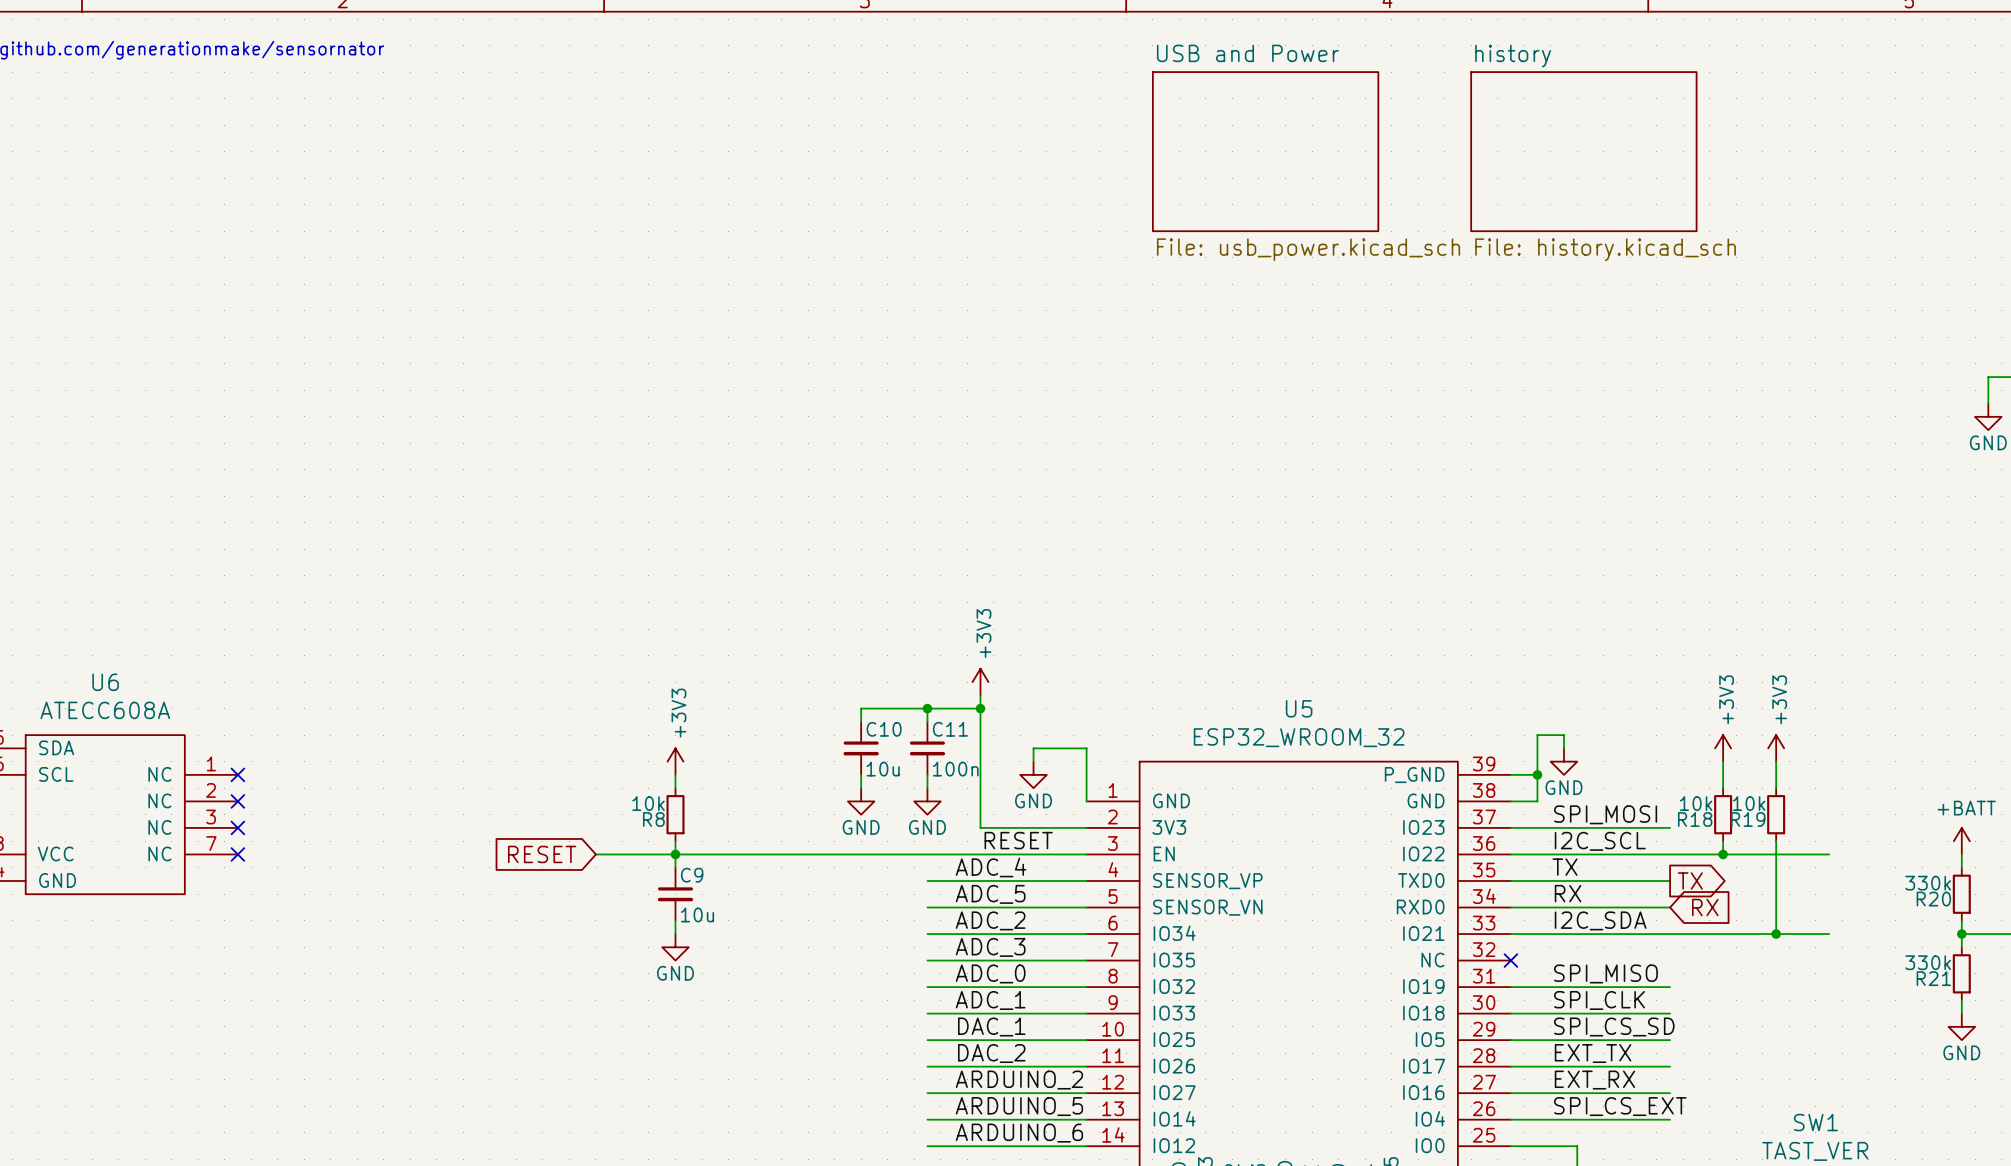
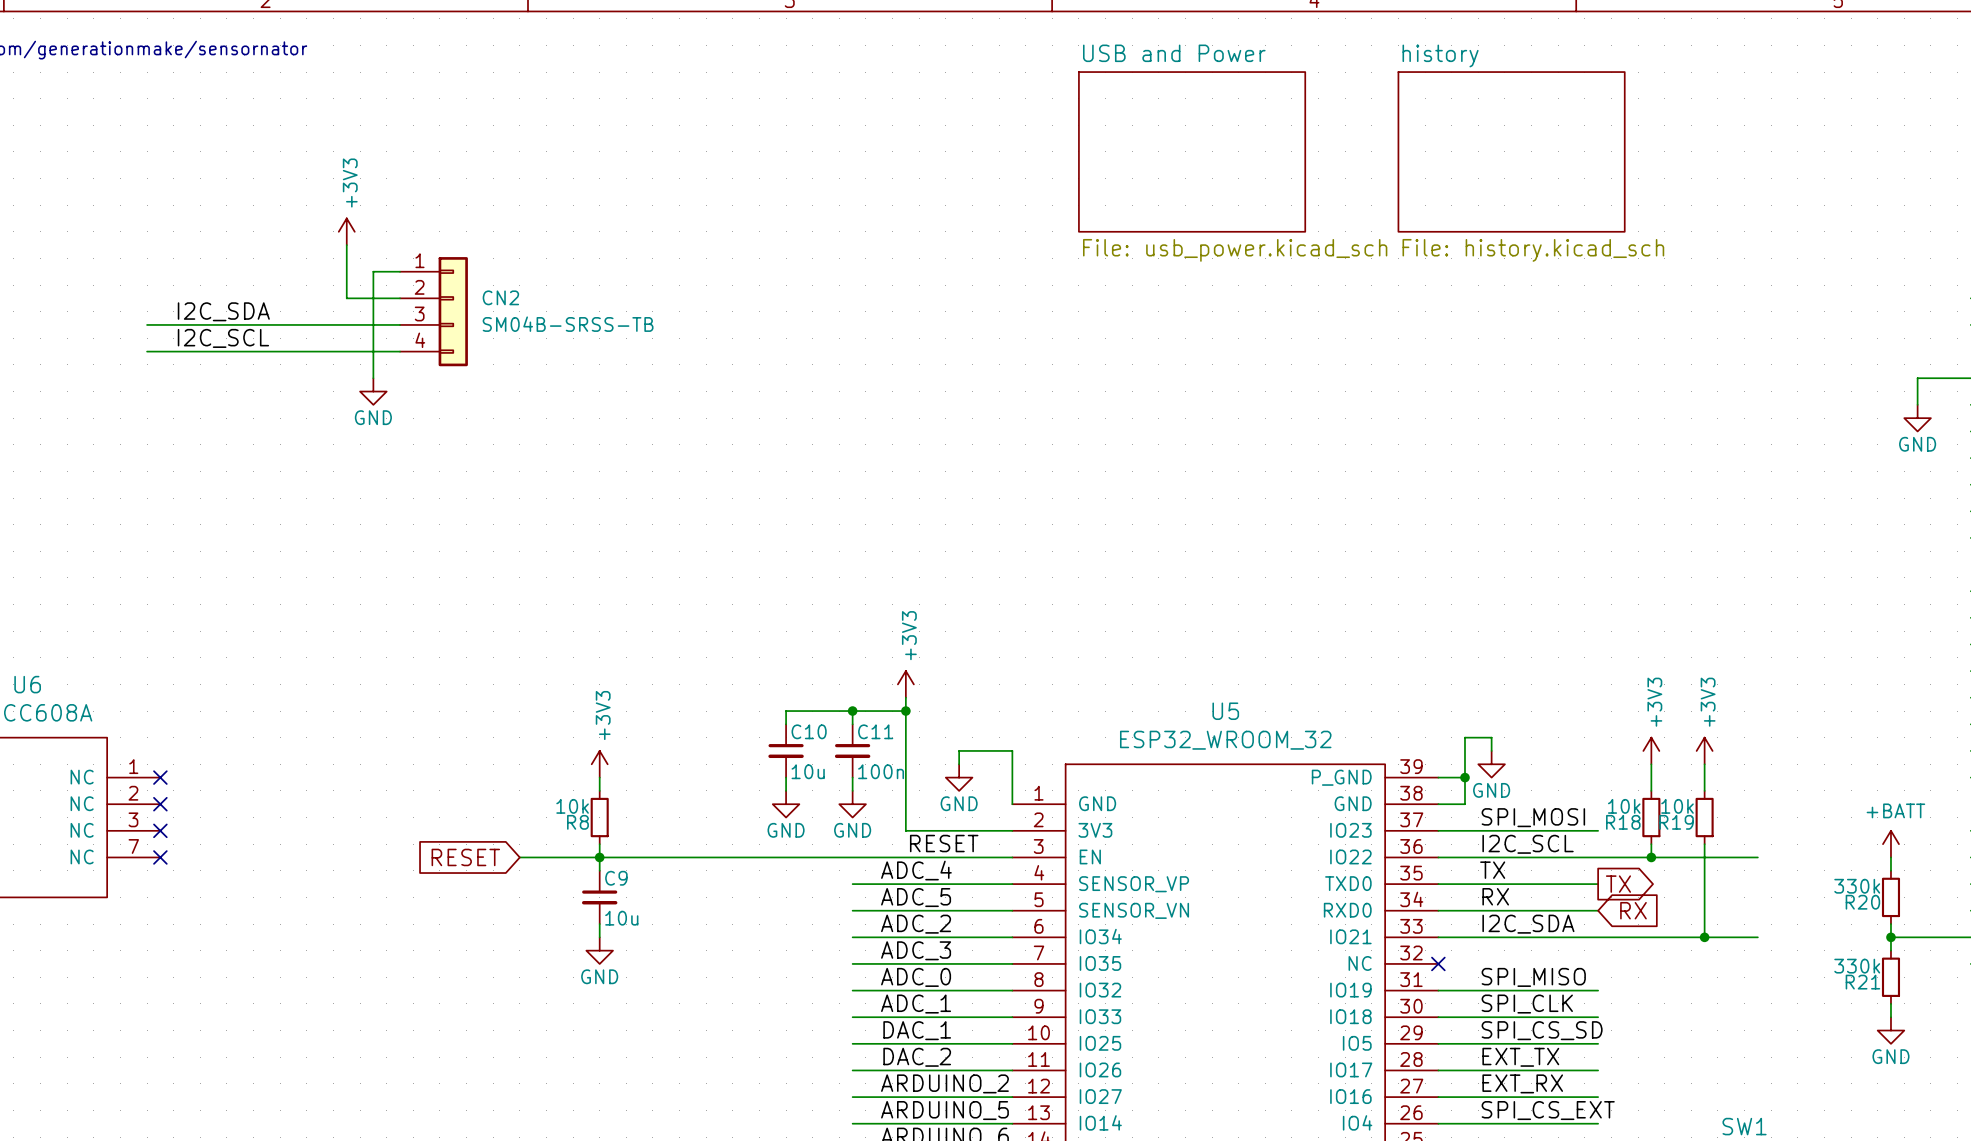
power symbol: none -> +3V3 (346, 231)
wire: none -> (346, 245) (346, 298) (400, 298)
wire: none -> (400, 271) (373, 271) (373, 378)
label: none -> I2C_SDA (223, 311)
CN2: none -> SM04B-SRSS-TB (433, 311)
wire: none -> (147, 324) (400, 324)
label: none -> I2C_SCL (223, 338)
wire: none -> (147, 351) (400, 351)
power symbol: none -> GND (373, 391)

